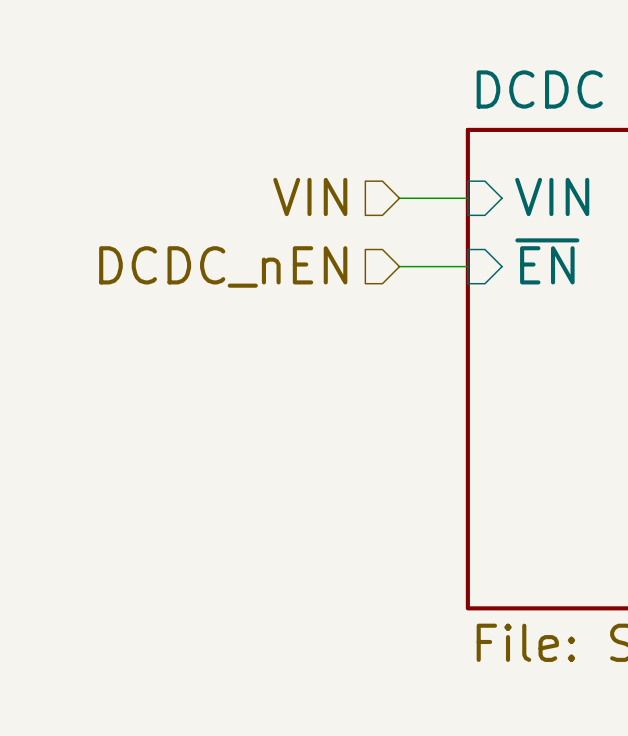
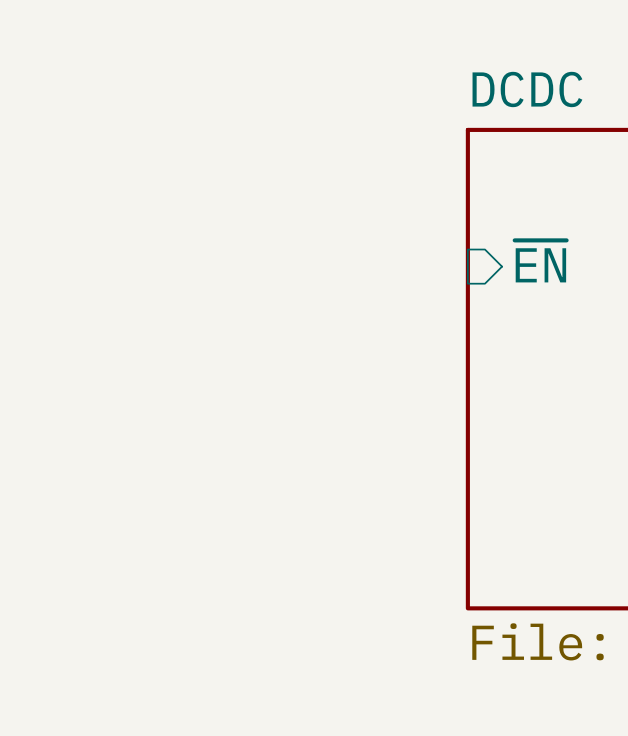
hierarchical label: VIN (310, 196) -> none
sheet pin: VIN (552, 196) -> none
wire: (399, 198) (467, 198) -> none
hierarchical label: DCDC_nEN (223, 266) -> none
wire: (399, 266) (467, 266) -> none

